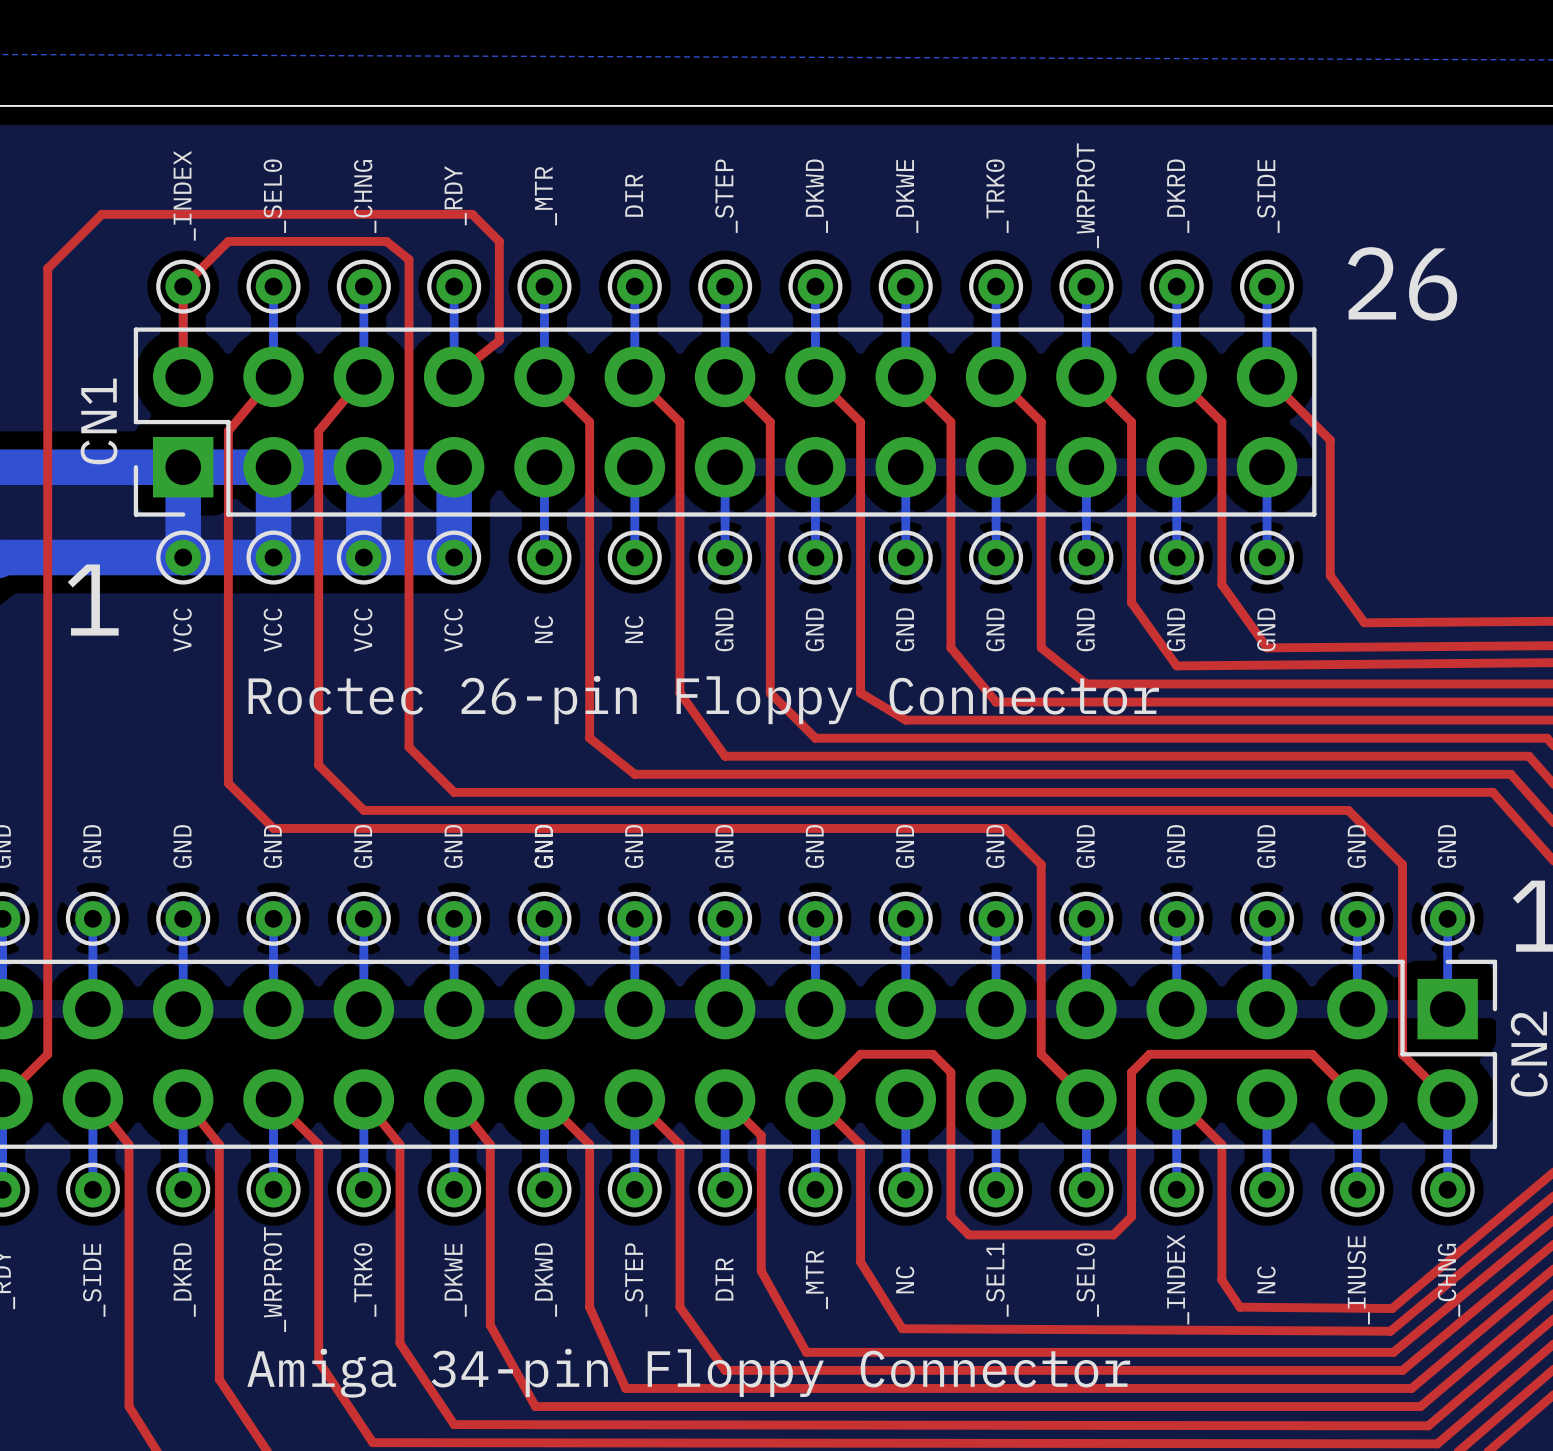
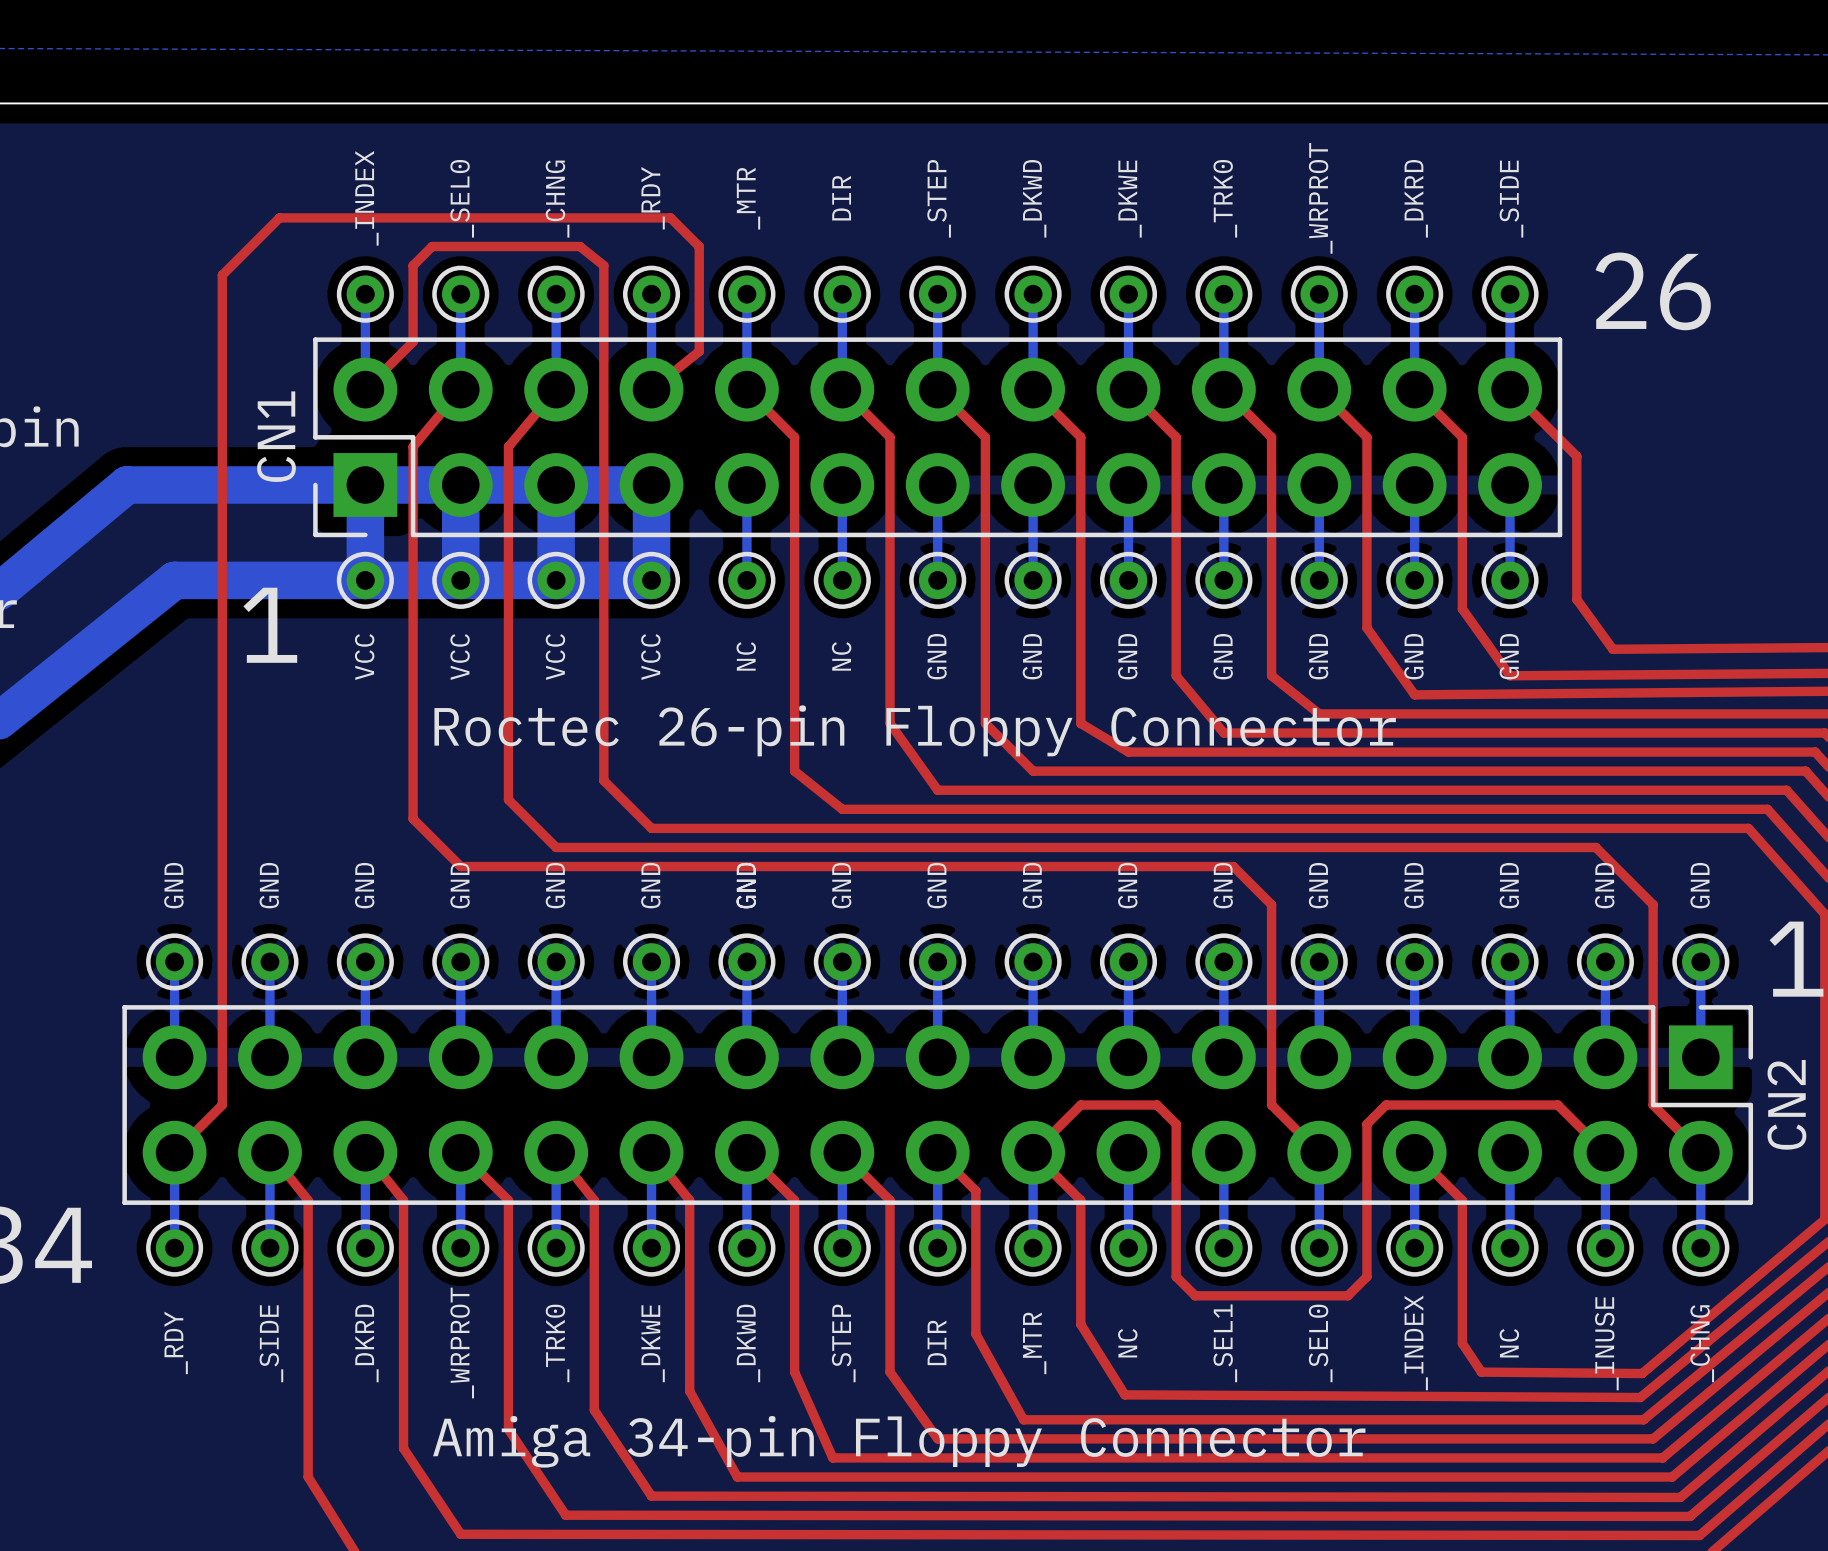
top track: (246, 241) (228, 241) (183, 286) (183, 376) -> (432, 246) (413, 265) (413, 341) (365, 389)

